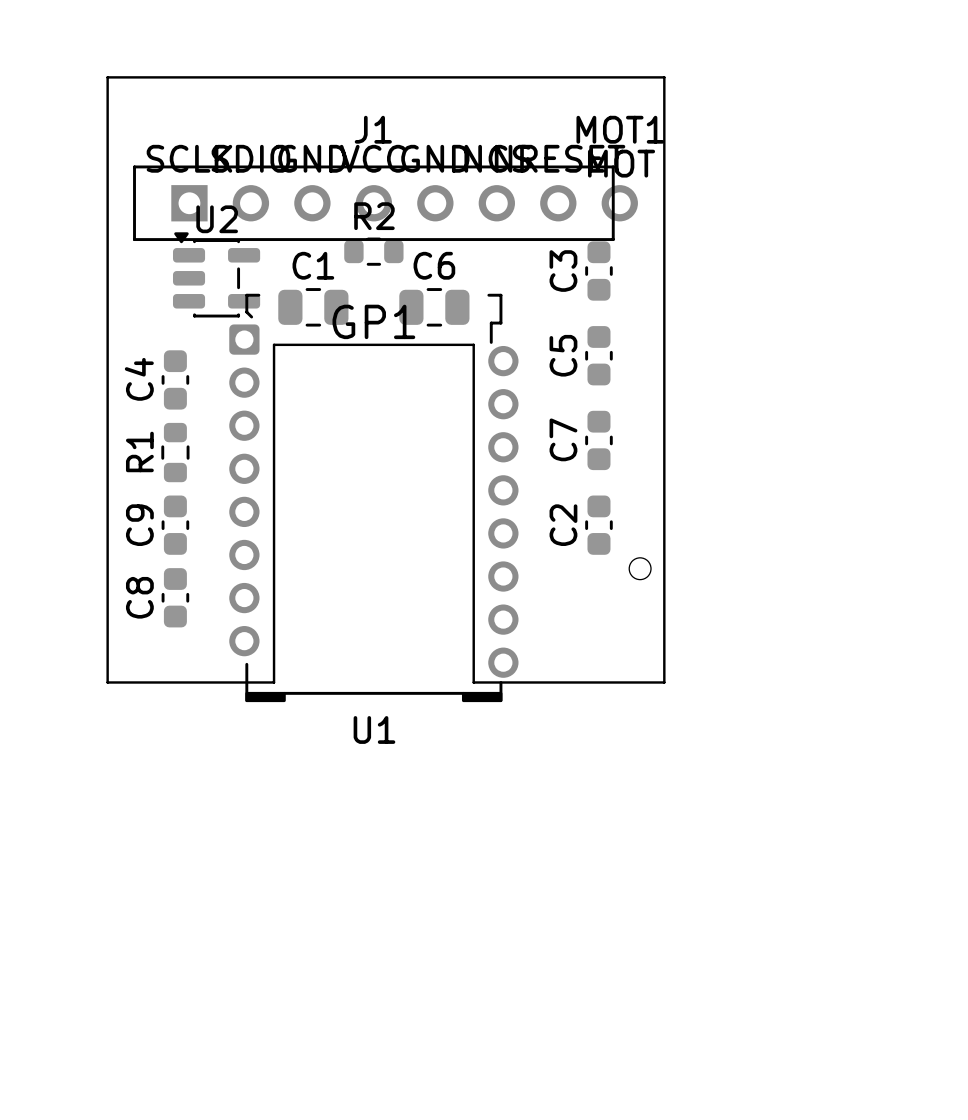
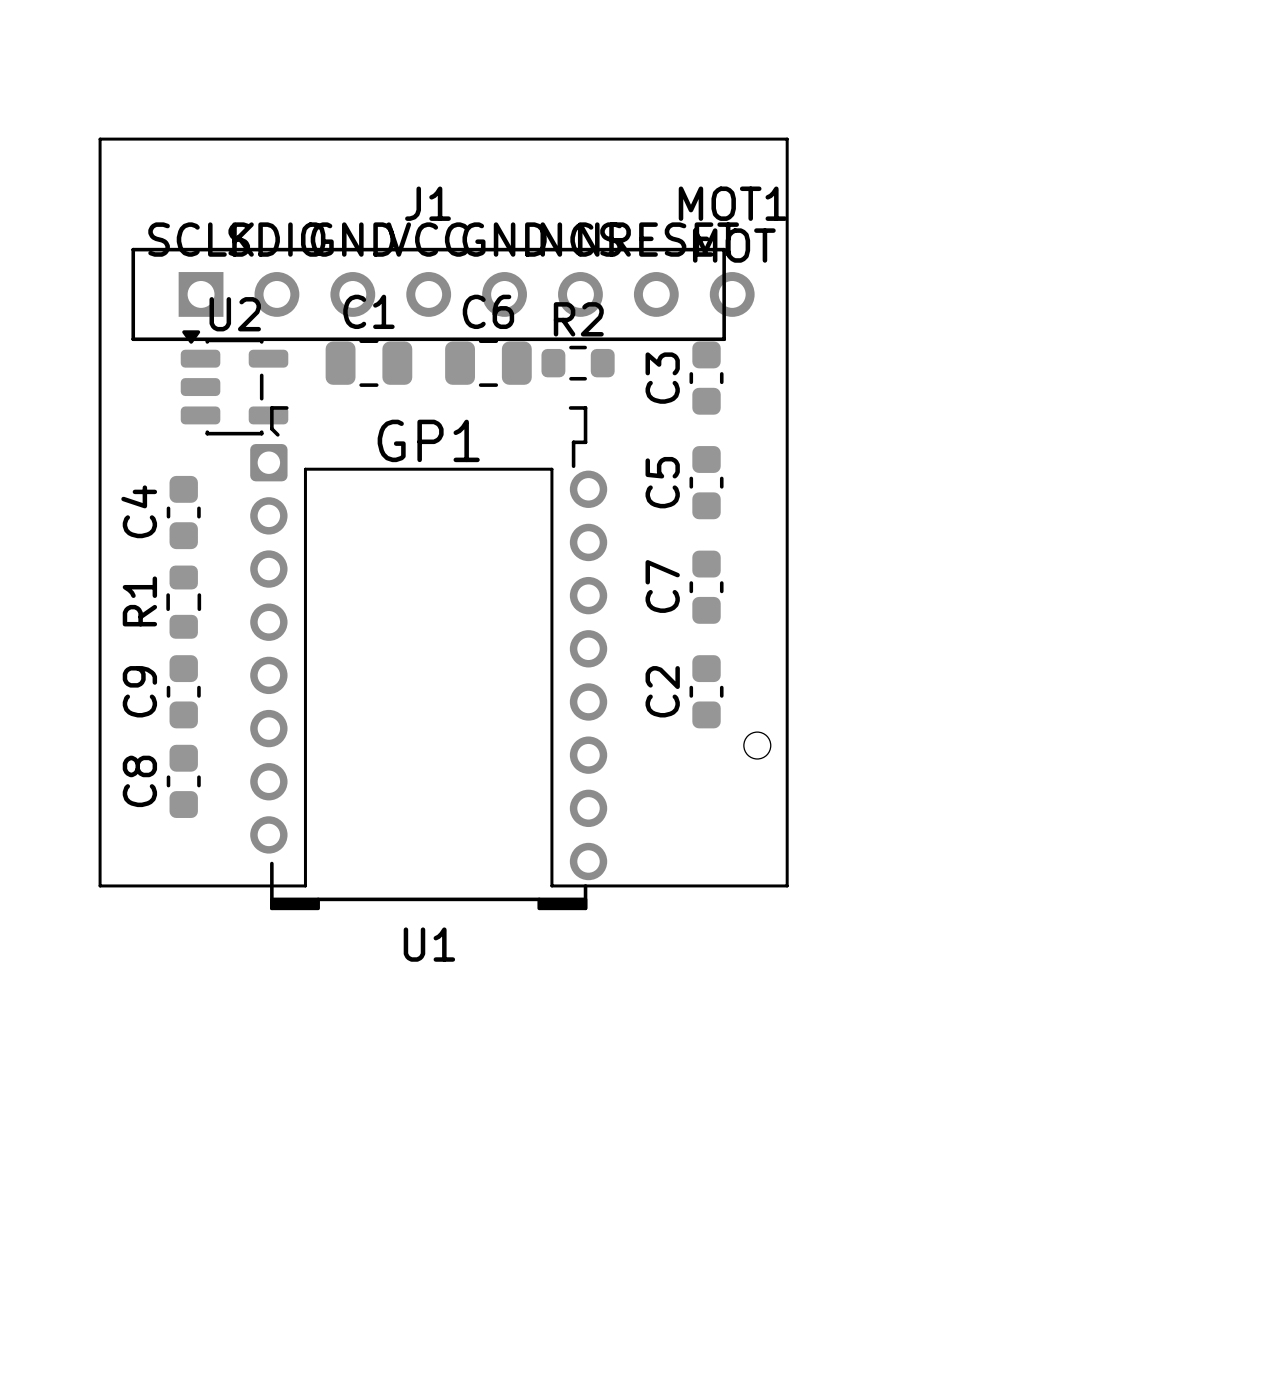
R2 position: (373, 251) -> (578, 363)
C1 position: (313, 307) -> (368, 363)
C6 position: (434, 307) -> (488, 363)

